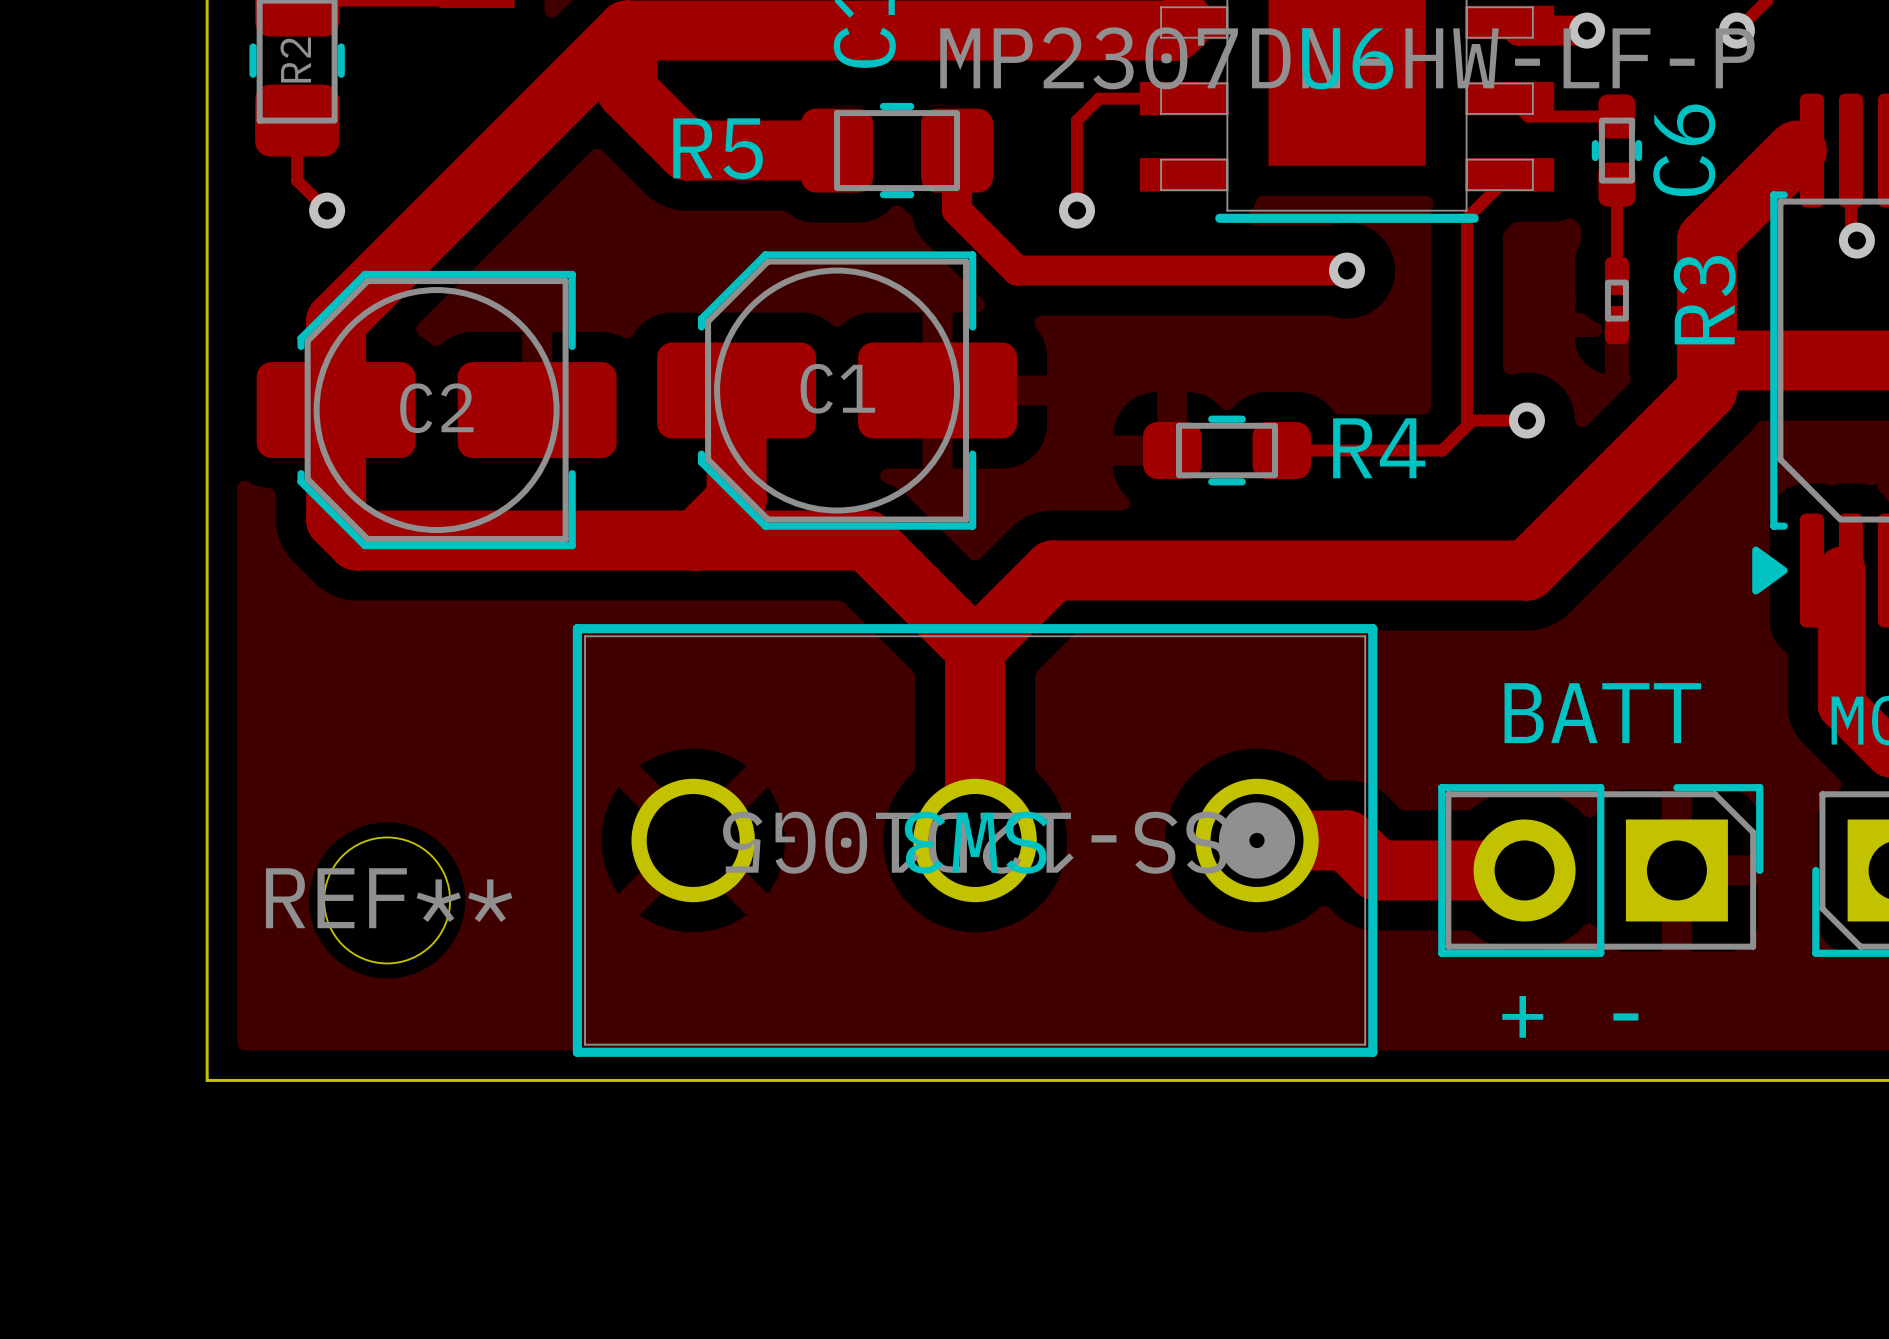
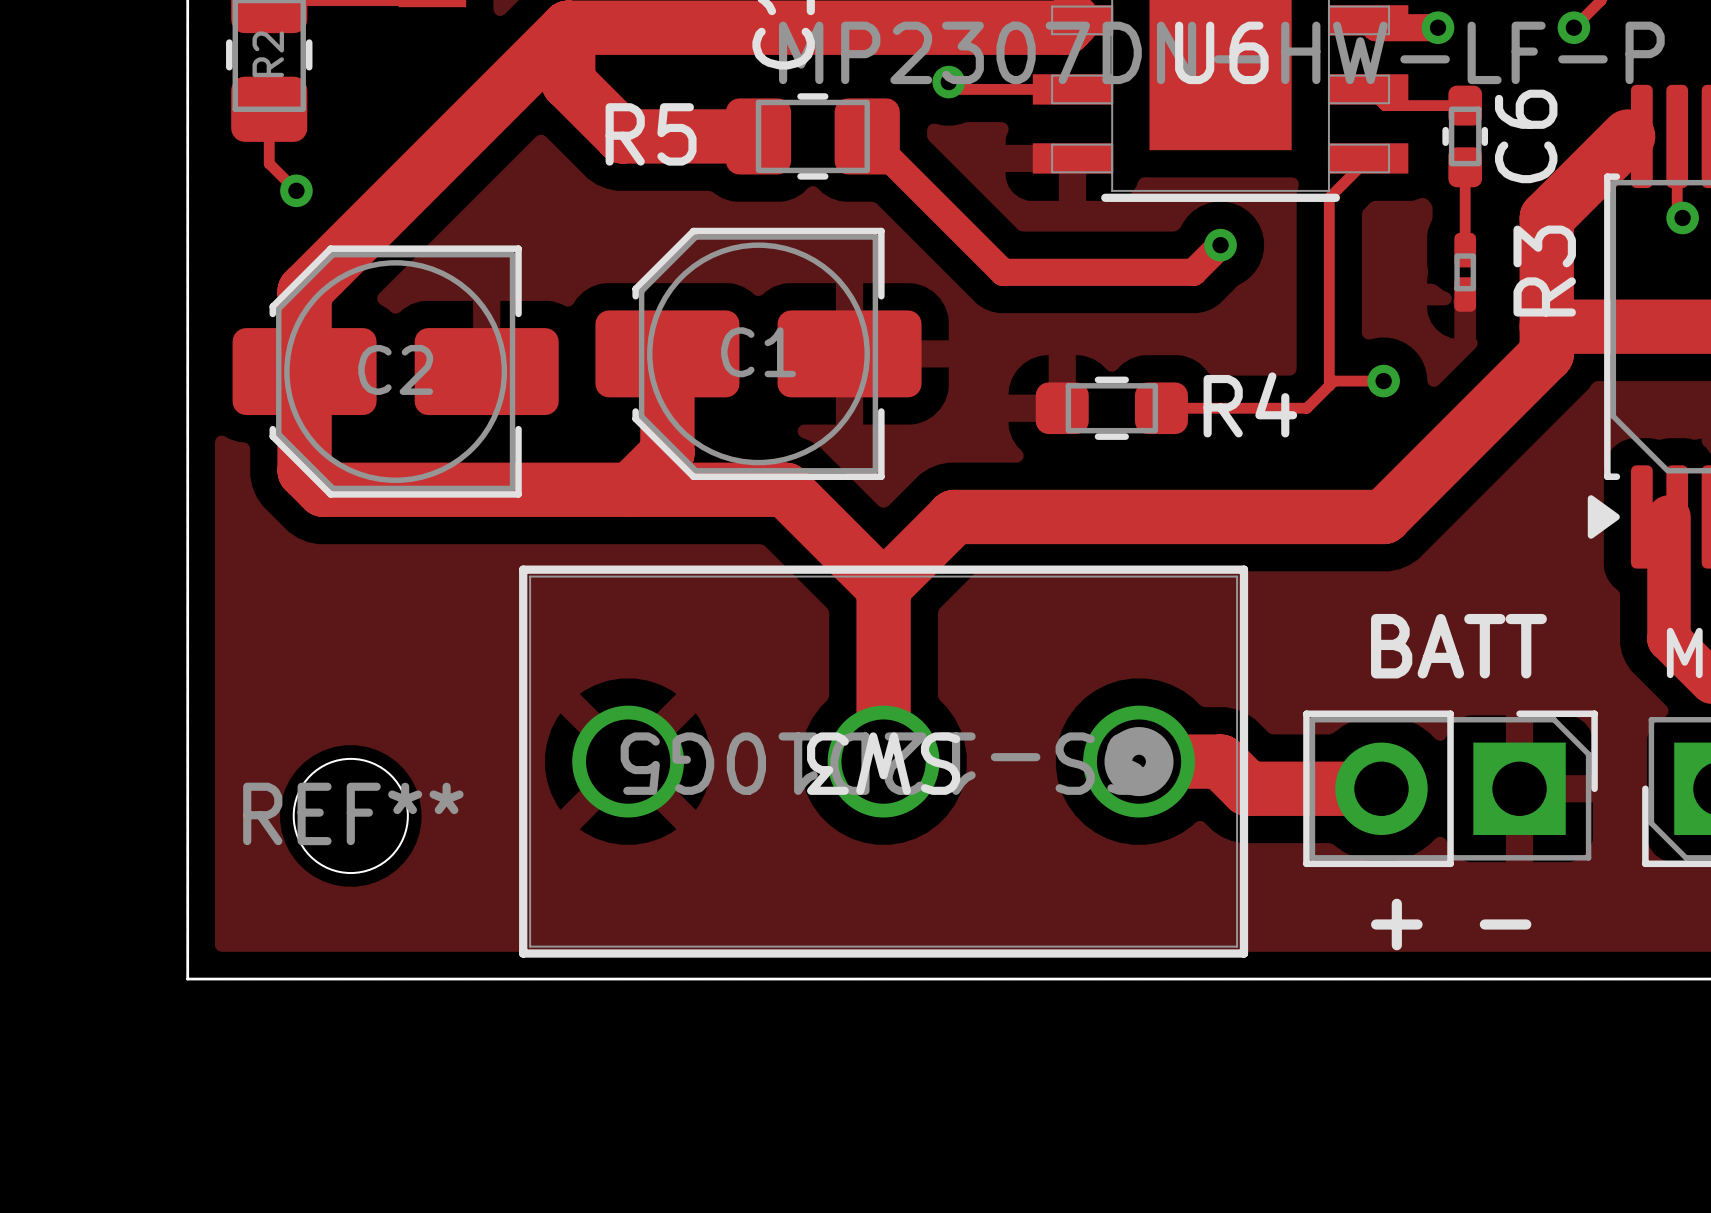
track: (1098, 98) (1077, 120) (1077, 210) -> (995, 89) (956, 89) (948, 82)
track: (957, 150) (957, 210) (1017, 270) (1346, 270) -> (867, 136) (1003, 272) (1193, 272) (1220, 245)
via position: (1077, 210) -> (948, 82)

